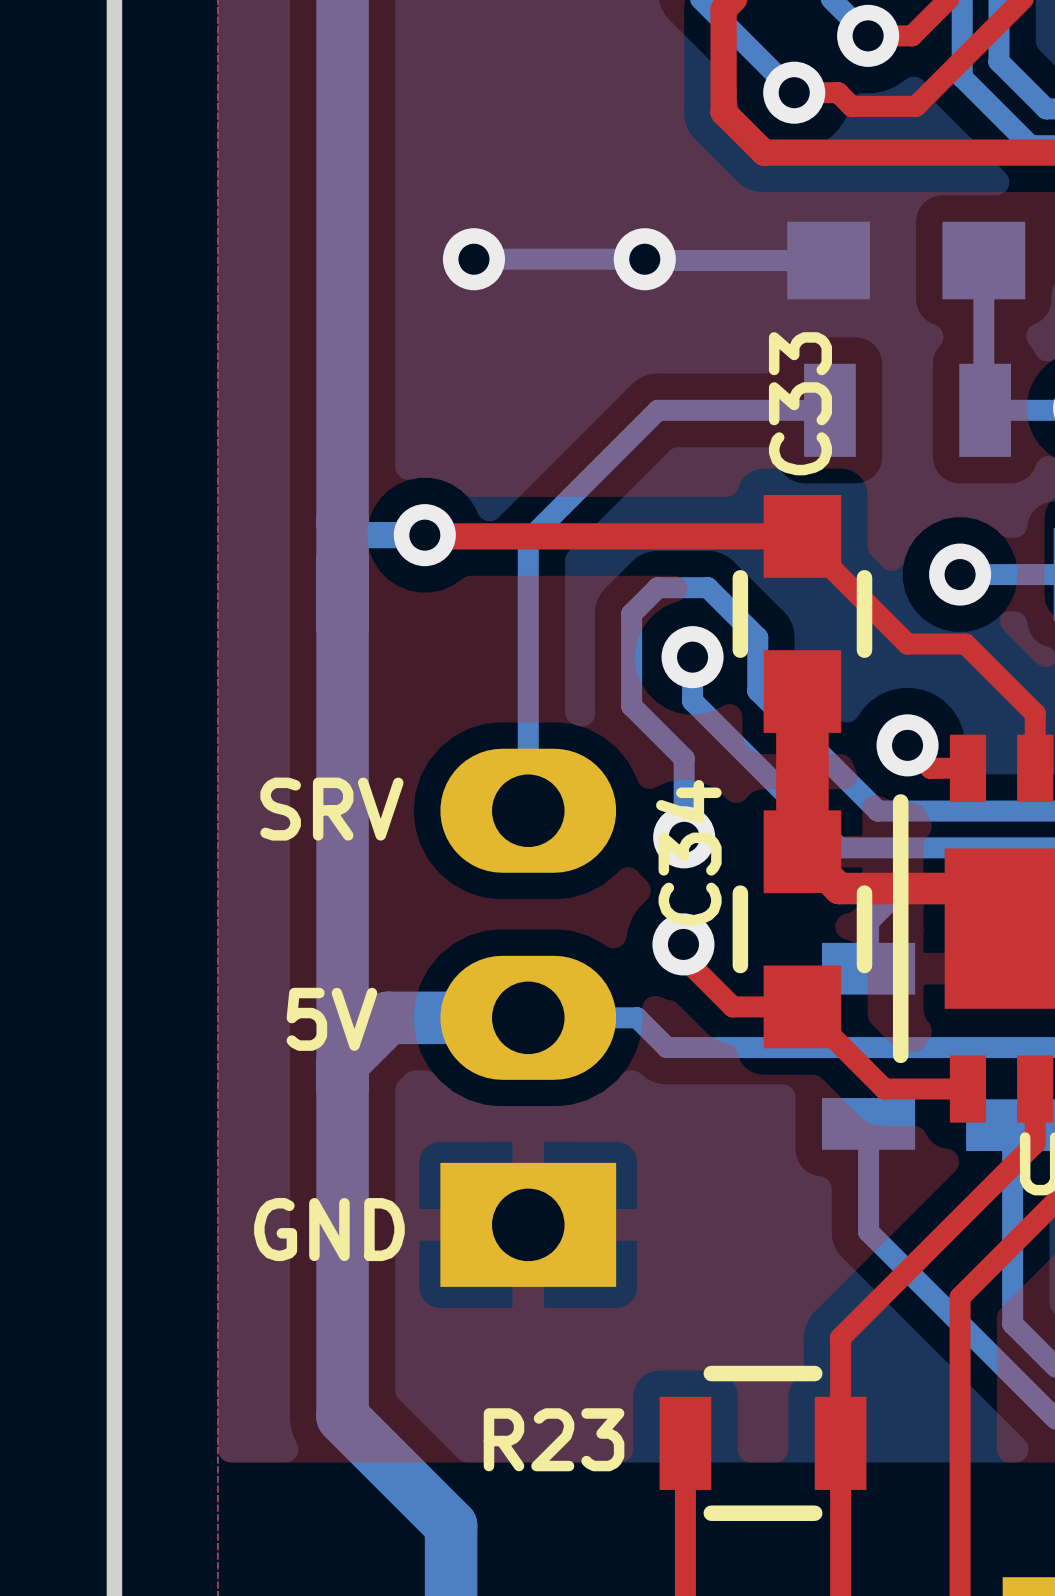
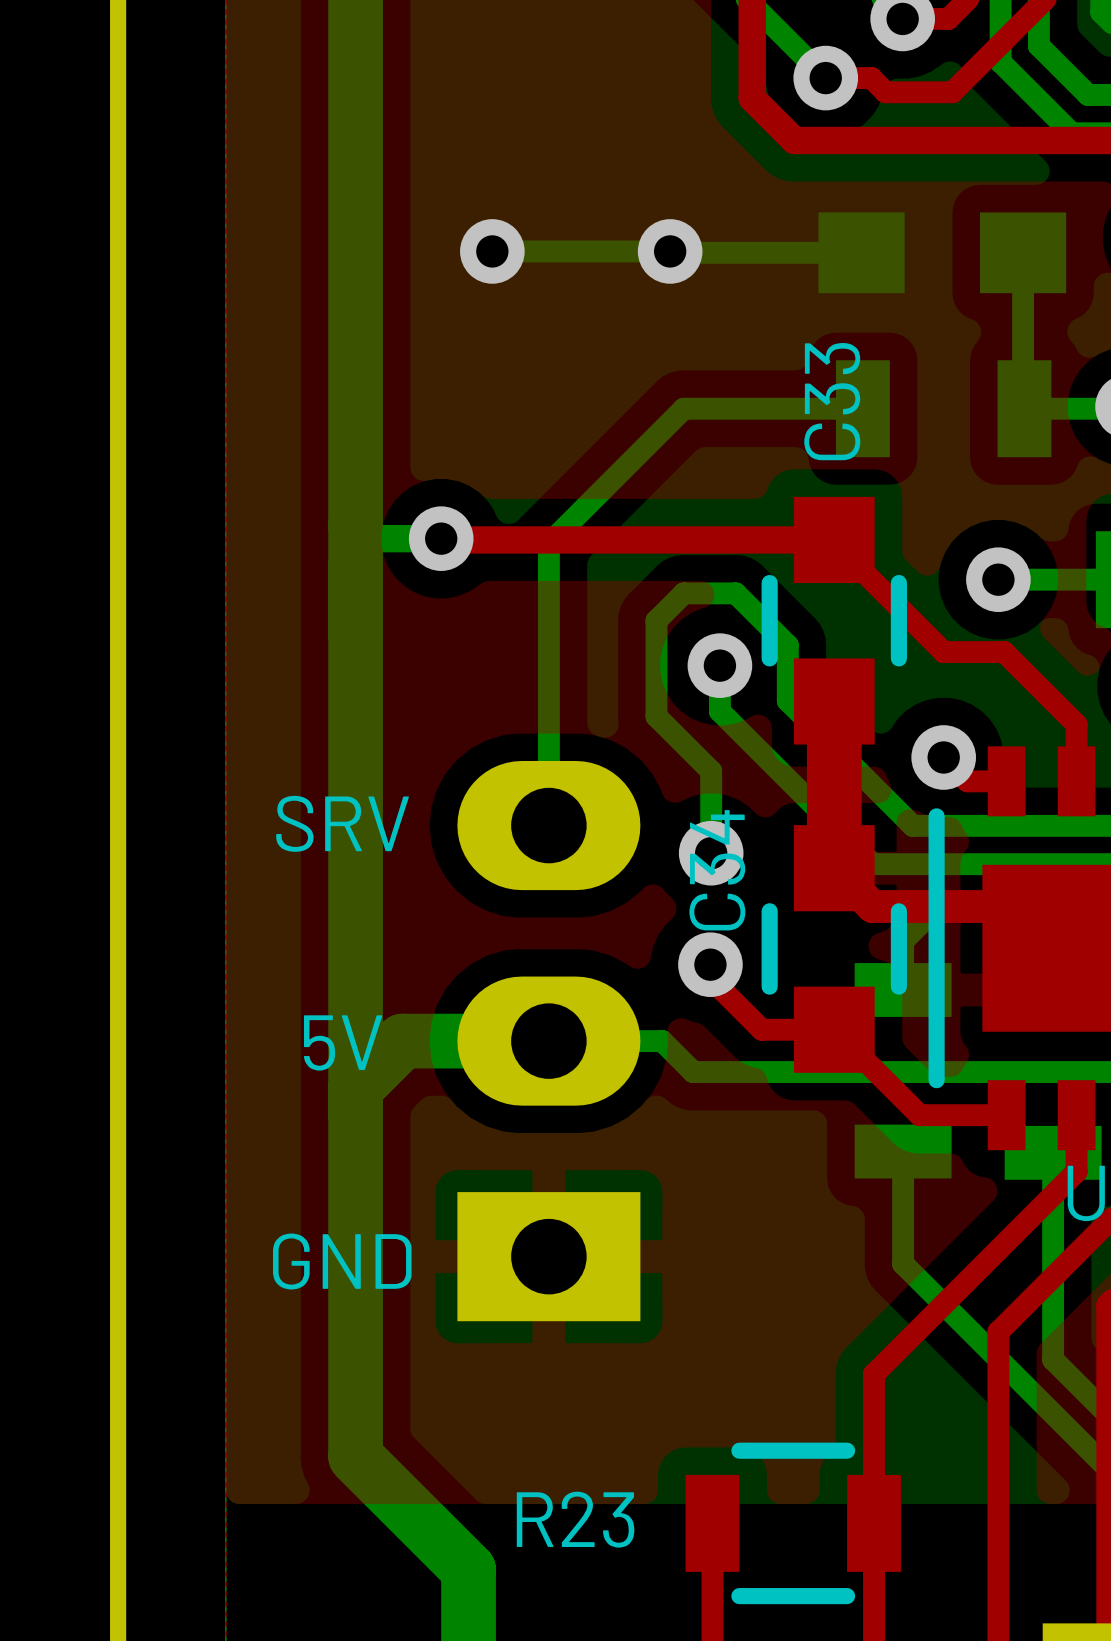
R23 position: (763, 1443) -> (793, 1523)

